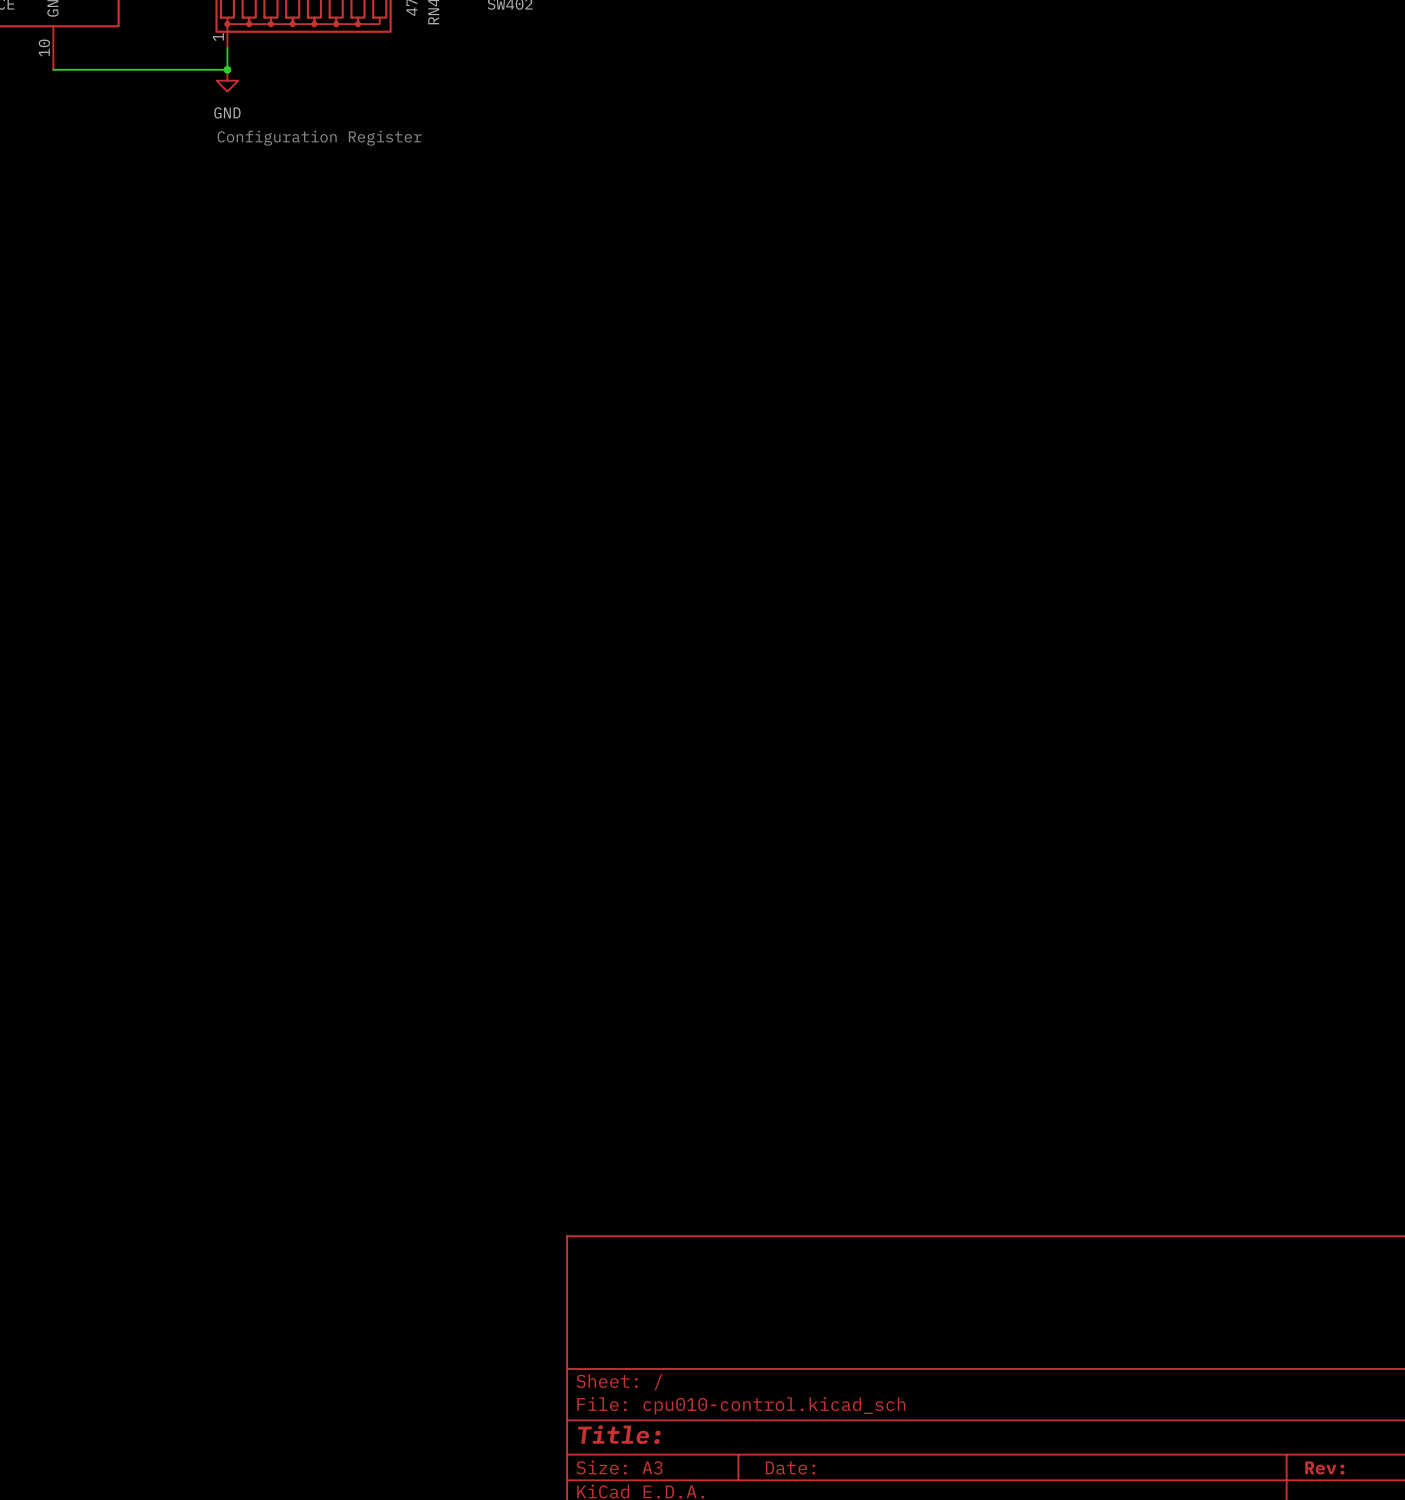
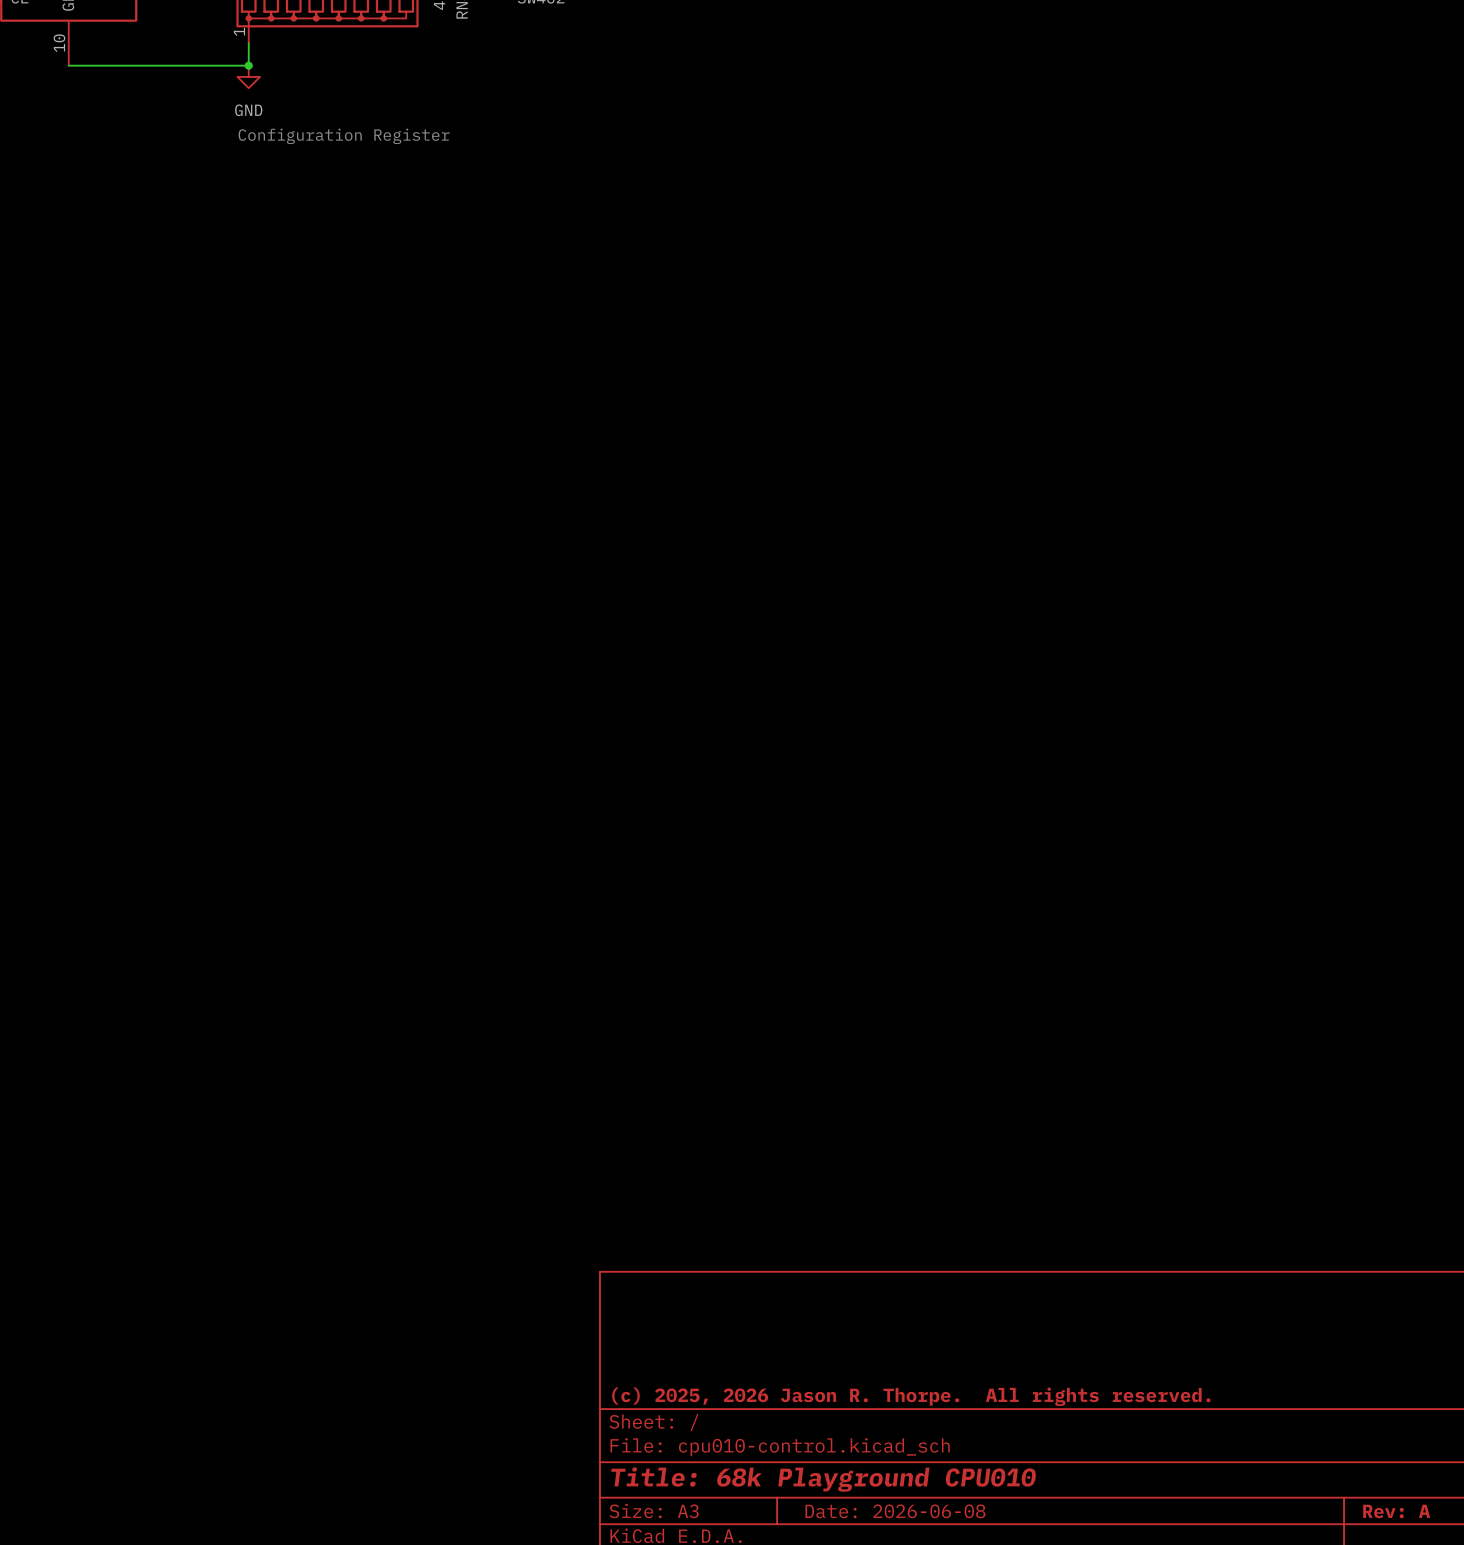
title block: none -> (c) 2025, 2026 Jason R. Thorpe. All rights reserved. (911, 1396)
title block: Title: (619, 1434) -> Title: 68k Playground CPU010 (823, 1479)
title block: Date: (790, 1467) -> Date: 2026-06-08 (895, 1511)
title block: Rev: (1324, 1467) -> Rev: A (1396, 1511)

